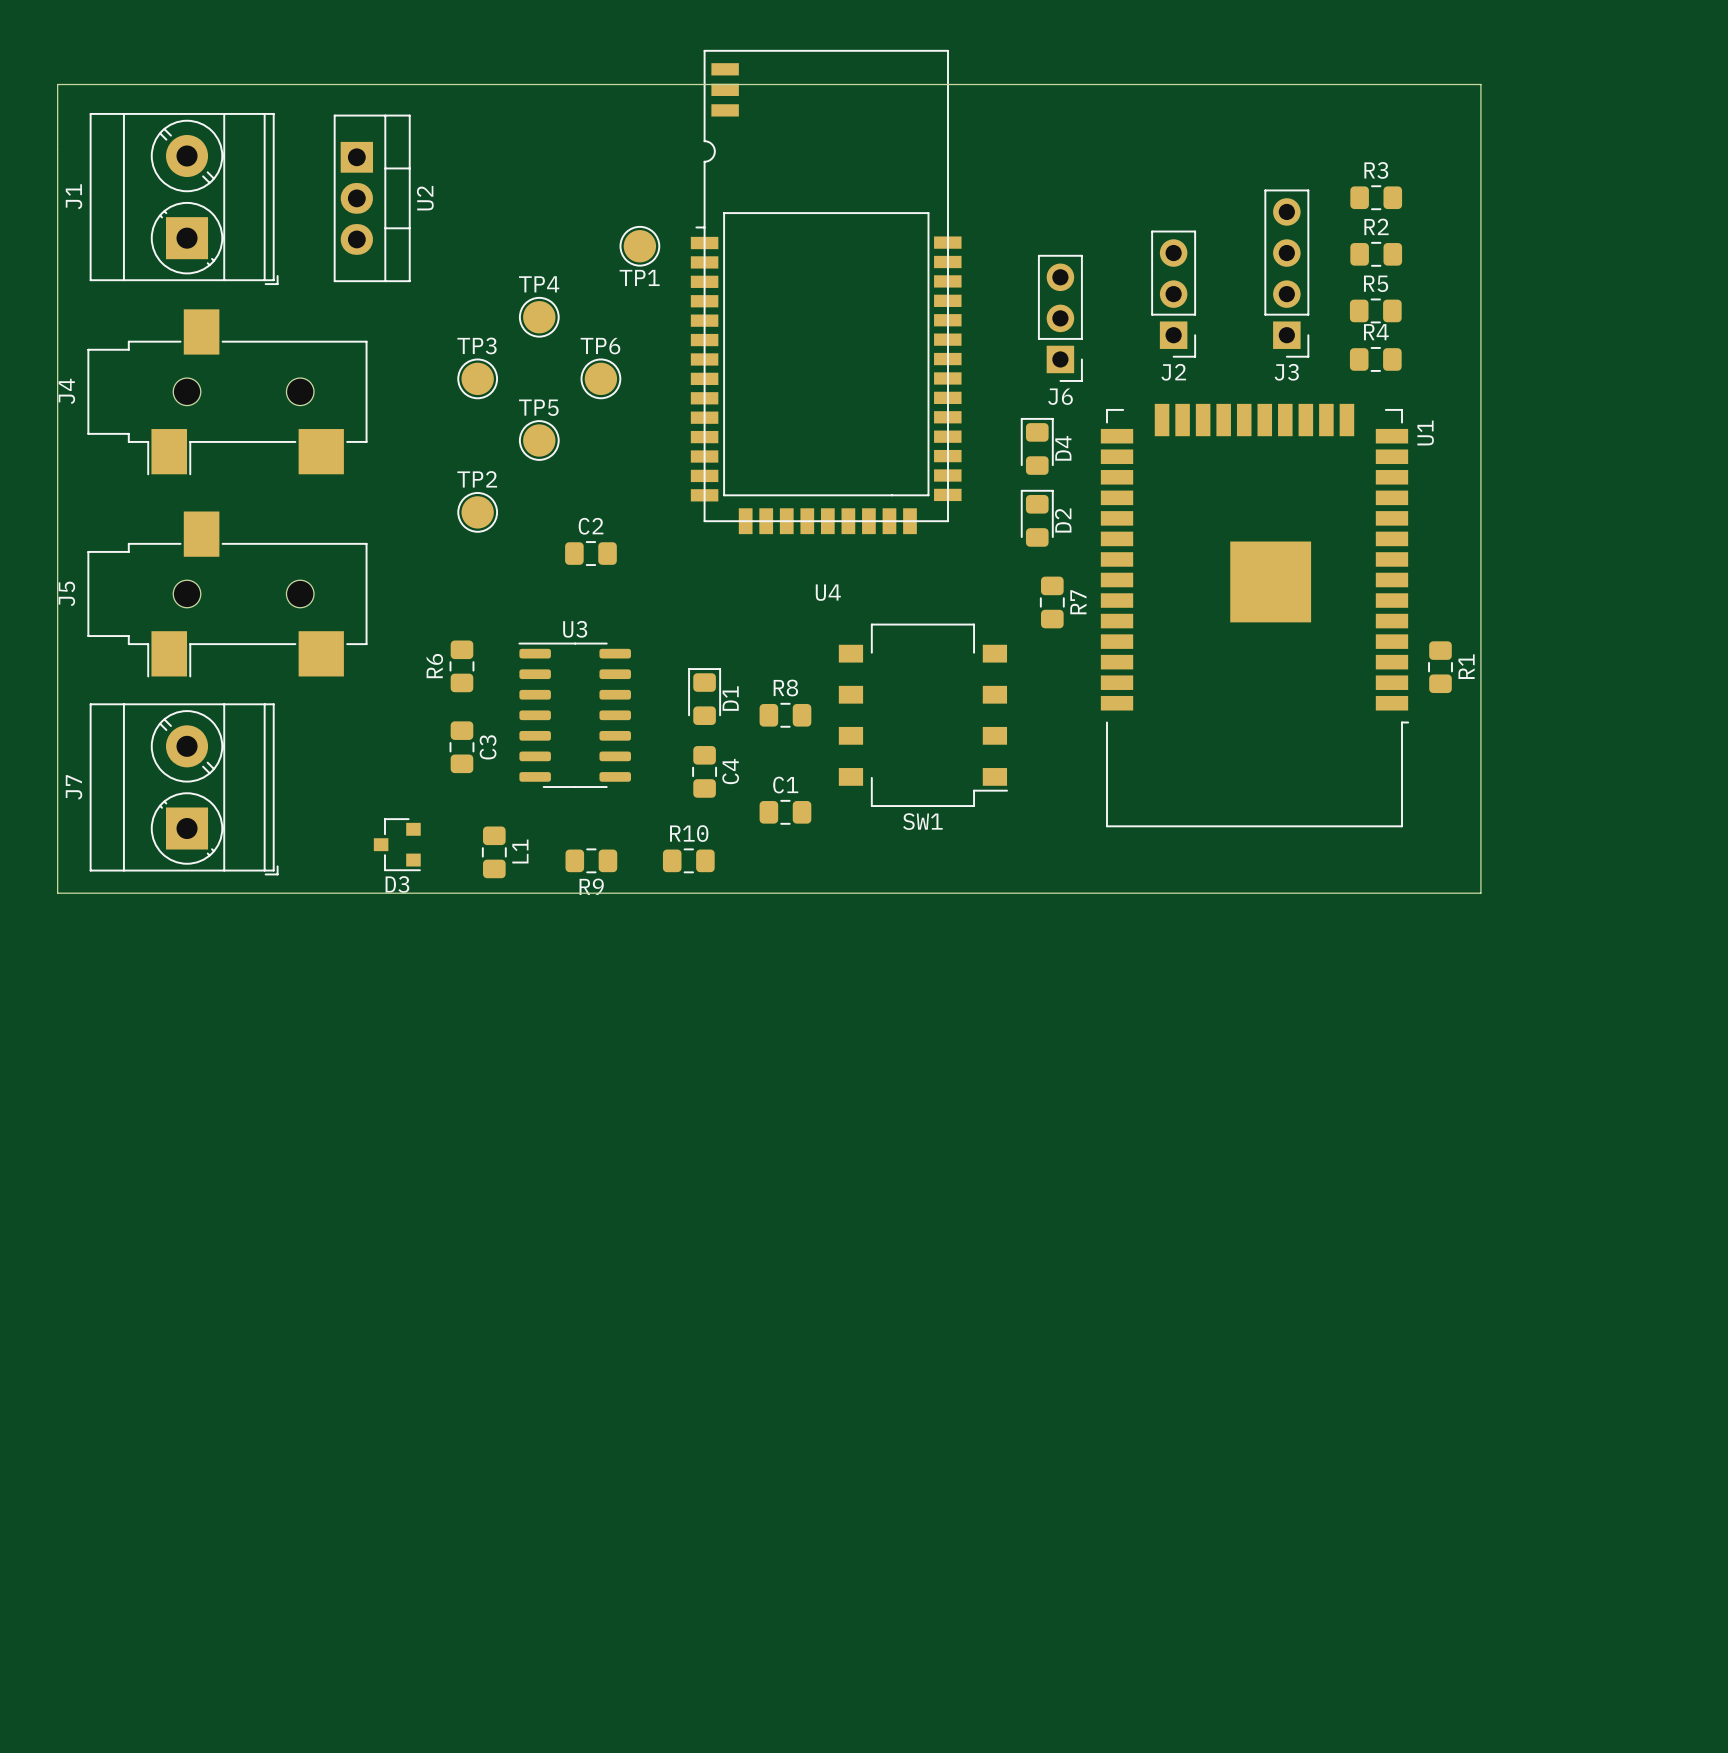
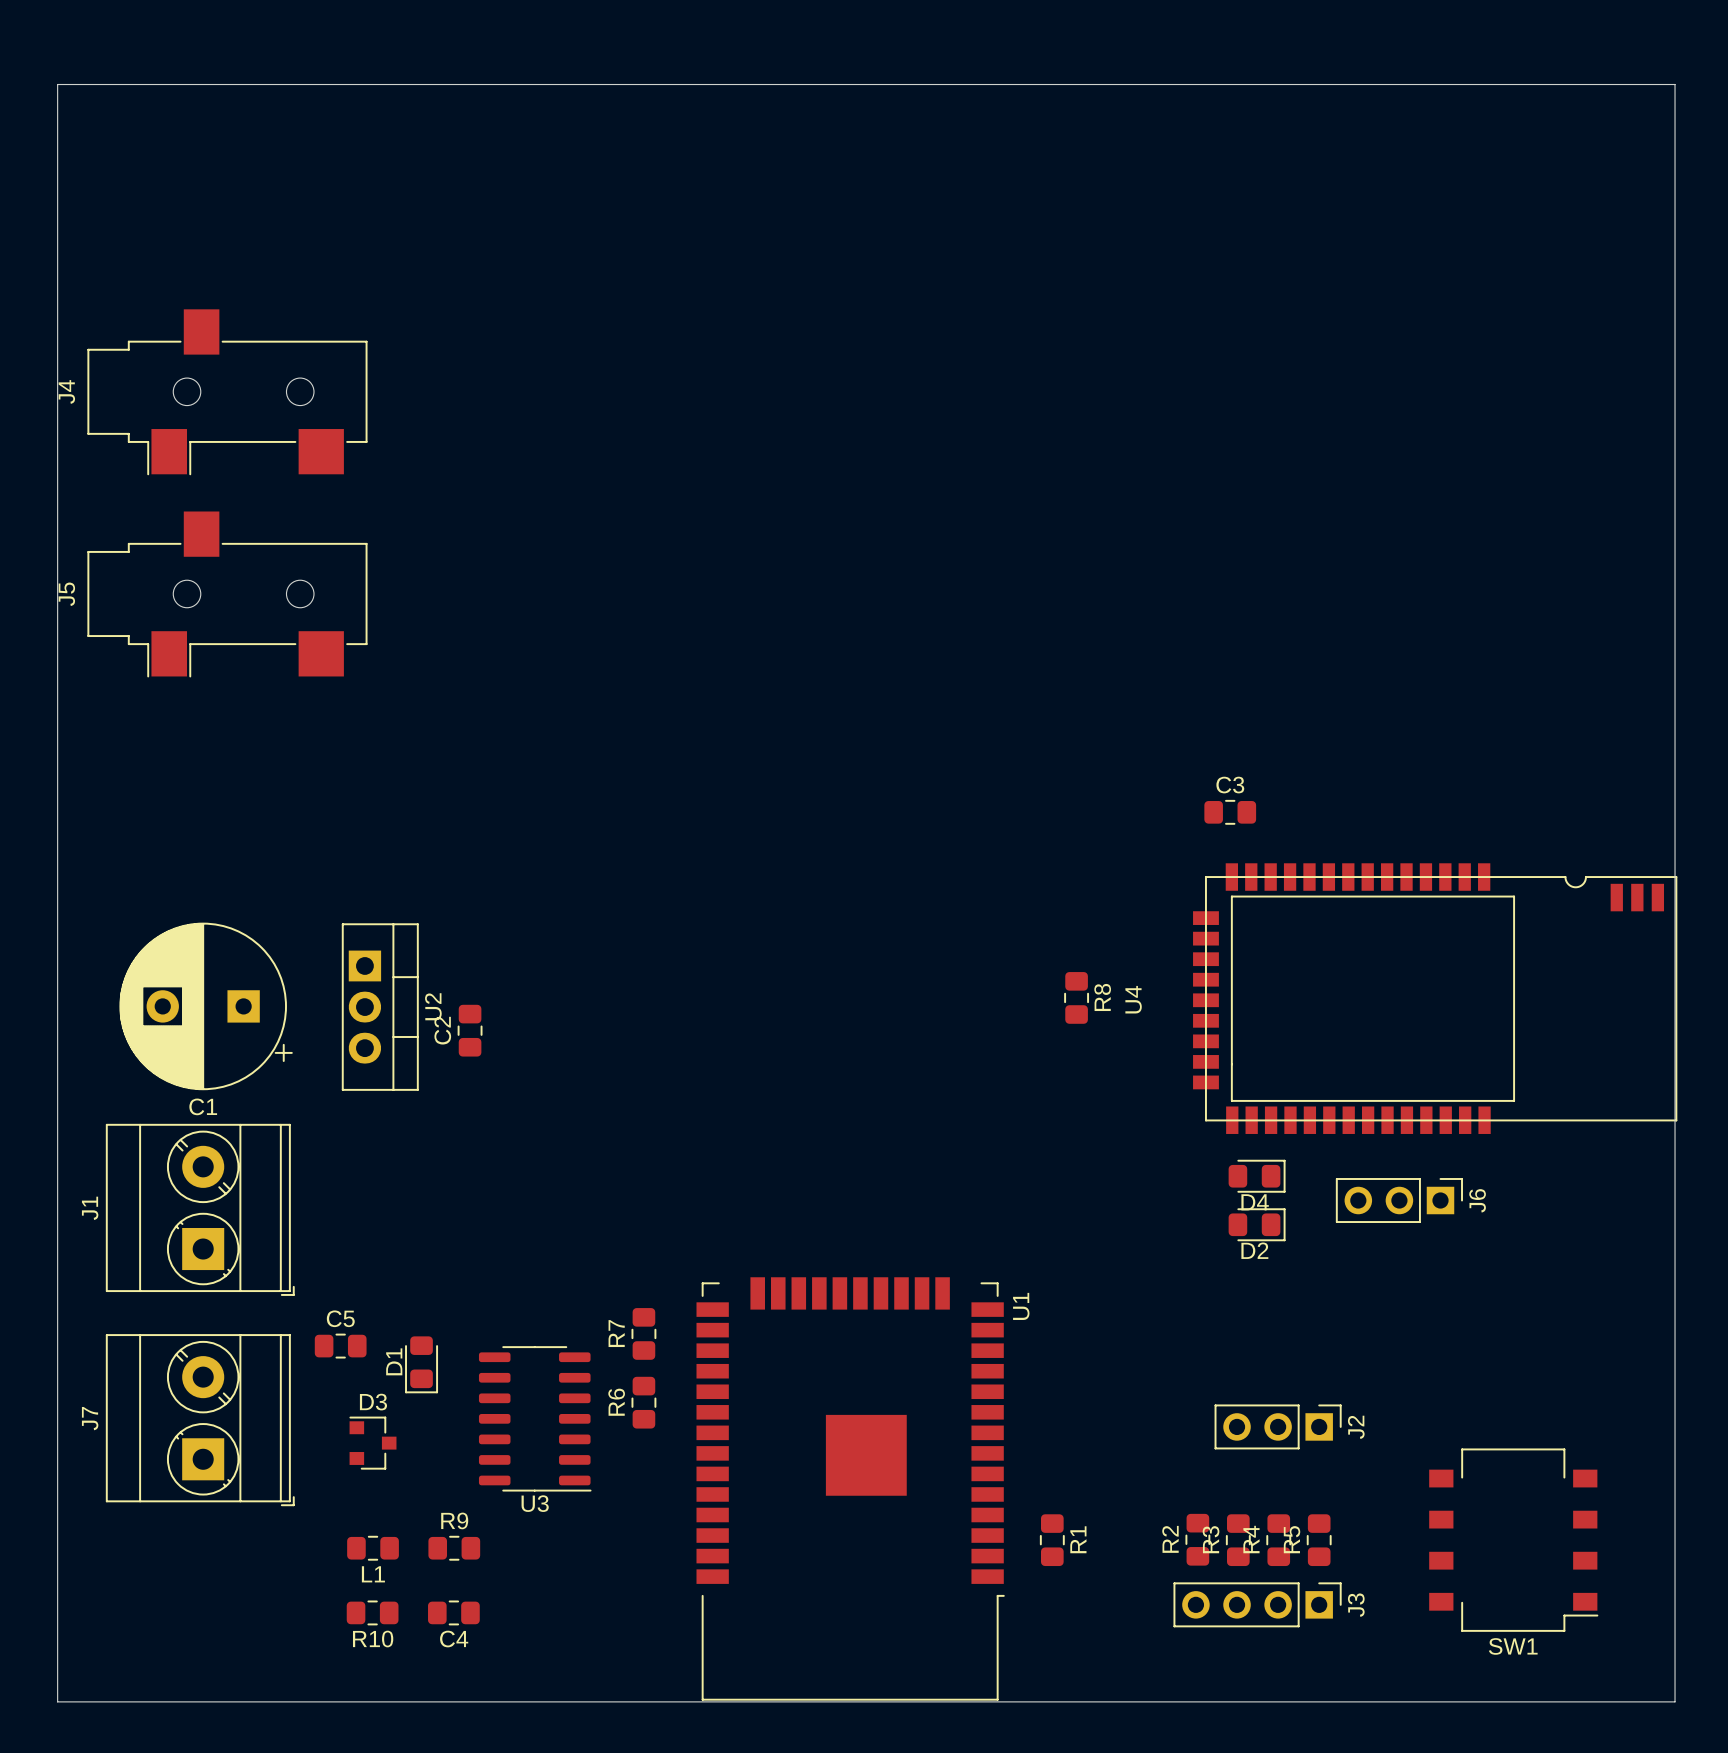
U4 footprint: [690, 49, 962, 535] -> [1193, 863, 1678, 1134]
board edge: (1480, 84) (1480, 893) (57, 893) -> (1480, 84) (1675, 84) (1675, 1701) (57, 1701) (57, 893)
R3 name position: R3 (1376, 170) -> R3 (1211, 1539)
R3 rotation: 0° (1376, 197) -> 90° clockwise (1238, 1540)
R3 position: (1376, 197) -> (1238, 1540)
U2 position: (372, 198) -> (380, 1007)
J1 position: (184, 199) -> (200, 1209)
R2 name position: R2 (1376, 226) -> R2 (1170, 1539)
TP1: (639, 246) -> none
R2 rotation: 0° (1376, 254) -> 90° clockwise (1197, 1539)
R2 position: (1376, 254) -> (1197, 1539)
J3 rotation: 0° (1286, 273) -> 90° counterclockwise (1257, 1604)
J3 position: (1286, 273) -> (1257, 1604)
R5 name position: R5 (1376, 283) -> R5 (1292, 1539)
J2 rotation: 0° (1173, 294) -> 90° counterclockwise (1278, 1426)
J2 position: (1173, 294) -> (1278, 1426)
R5 rotation: 0° (1375, 310) -> 90° clockwise (1319, 1540)
R5 position: (1375, 310) -> (1319, 1540)
TP4: (539, 317) -> none
J6 rotation: 0° (1060, 318) -> 90° counterclockwise (1399, 1200)
J6 position: (1060, 318) -> (1399, 1200)
R4 name position: R4 (1376, 332) -> R4 (1251, 1539)
R4 rotation: 0° (1375, 359) -> 90° clockwise (1278, 1540)
R4 position: (1375, 359) -> (1278, 1540)
TP3: (477, 378) -> none
TP6: (600, 378) -> none
TP5: (539, 440) -> none
D4 rotation: 0° (1037, 446) -> 90° clockwise (1257, 1176)
D4 position: (1037, 446) -> (1257, 1176)
TP2: (477, 512) -> none
D2 rotation: 0° (1037, 518) -> 90° clockwise (1257, 1224)
D2 position: (1037, 518) -> (1257, 1224)
C2 name position: C2 (591, 526) -> C2 (442, 1030)
C2 rotation: 0° (590, 553) -> 90° clockwise (470, 1030)
C2 position: (590, 553) -> (470, 1030)
U4 name position: U4 (828, 592) -> U4 (1133, 999)
R7 position: (1052, 602) -> (643, 1333)
R7 name position: R7 (1078, 602) -> R7 (616, 1333)
U1 position: (1254, 615) -> (850, 1488)
R6 position: (461, 666) -> (643, 1402)
R1 position: (1440, 667) -> (1052, 1540)
D1 rotation: 0° (704, 696) -> 180° (421, 1364)
D1 position: (704, 696) -> (421, 1364)
U3 rotation: 0° (574, 715) -> 180° (535, 1418)
U3 position: (574, 715) -> (535, 1418)
R8 rotation: 0° (785, 715) -> 90° clockwise (1076, 997)
R8 position: (785, 715) -> (1076, 997)
SW1 position: (923, 715) -> (1513, 1540)
C3 rotation: 0° (461, 747) -> 90° clockwise (1230, 812)
C3 position: (461, 747) -> (1230, 812)
C3 name position: C3 (488, 747) -> C3 (1230, 785)
C4 rotation: 0° (704, 771) -> 90° clockwise (453, 1612)
C4 position: (704, 771) -> (453, 1612)
C1 name position: C1 (785, 785) -> C1 (203, 1106)
J7 position: (184, 789) -> (200, 1420)
C1 footprint: [759, 799, 812, 825] -> [119, 922, 293, 1091]
R10 name position: R10 (689, 833) -> R10 (373, 1639)
D3 rotation: 0° (397, 844) -> 180° (372, 1443)
D3 position: (397, 844) -> (372, 1443)
L1 rotation: 0° (494, 852) -> 90° clockwise (373, 1548)
L1 position: (494, 852) -> (373, 1548)
R9 position: (591, 860) -> (454, 1548)
R10 position: (688, 860) -> (372, 1612)
R9 name position: R9 (591, 886) -> R9 (454, 1520)
C5: none -> (340, 1346)

